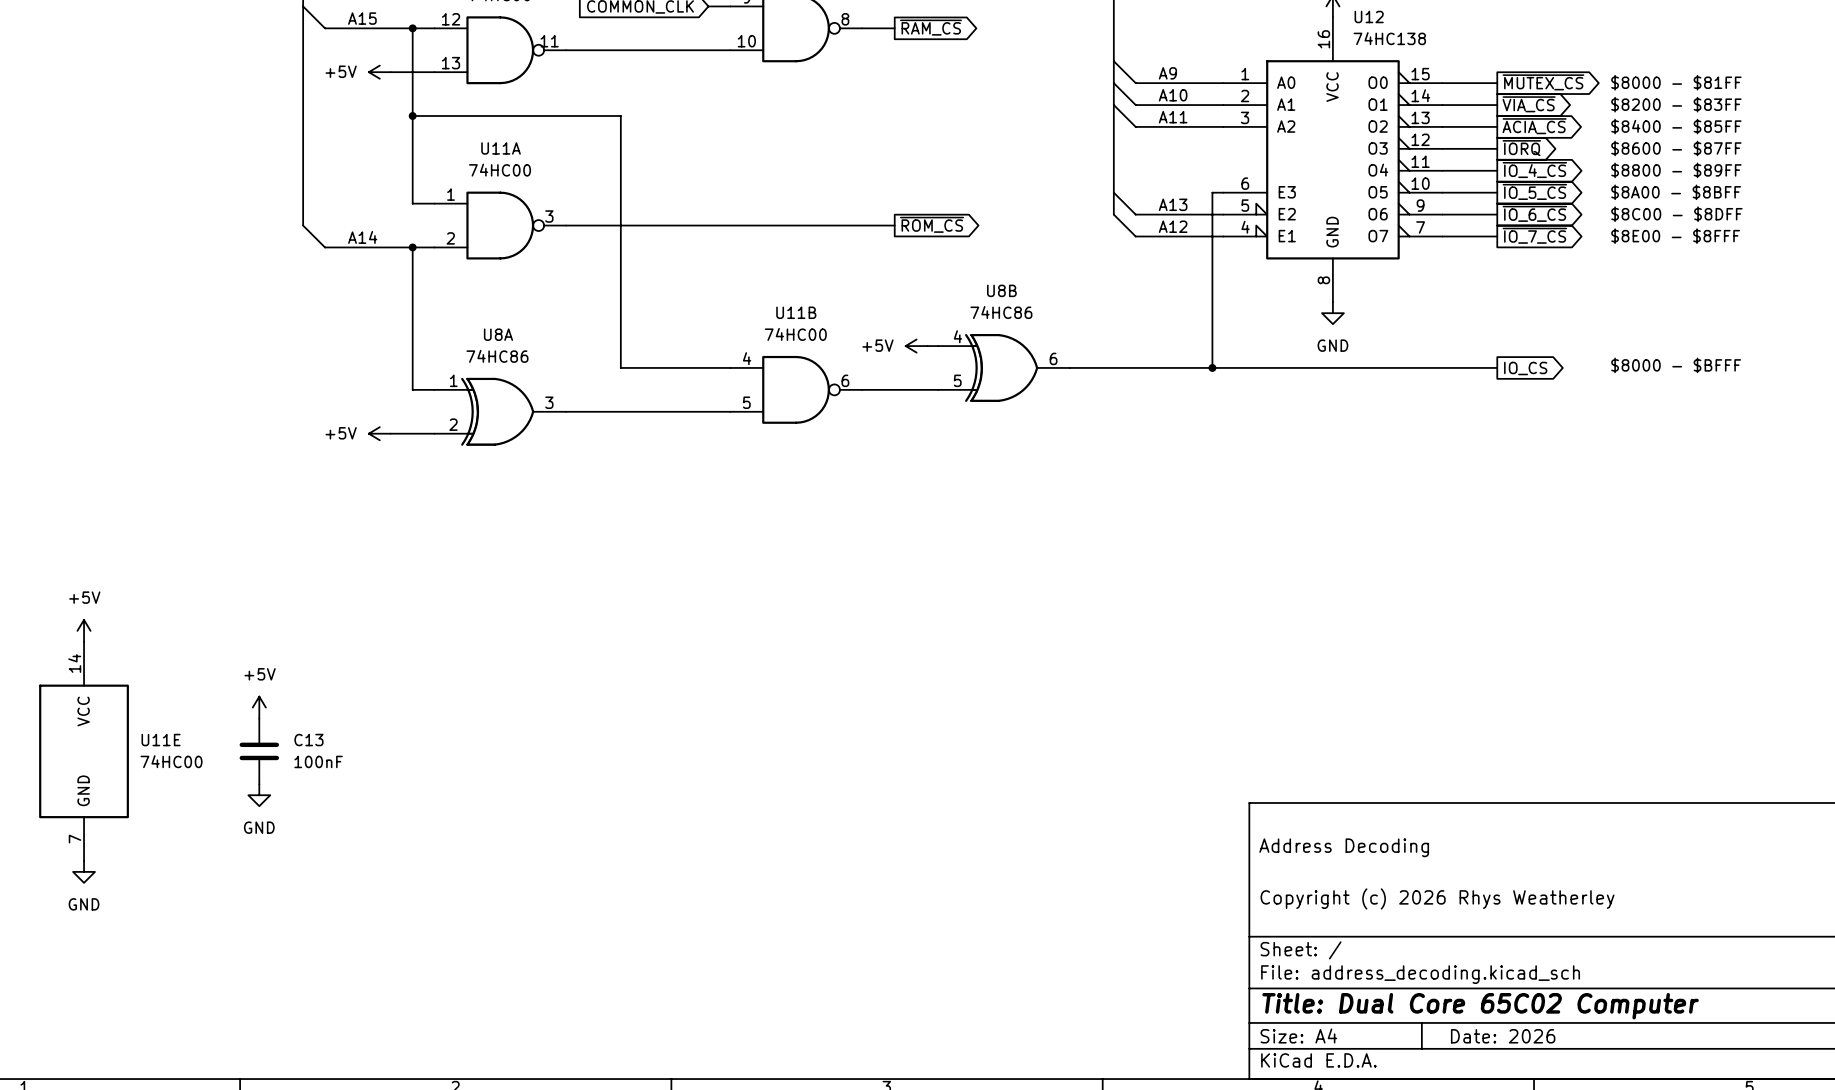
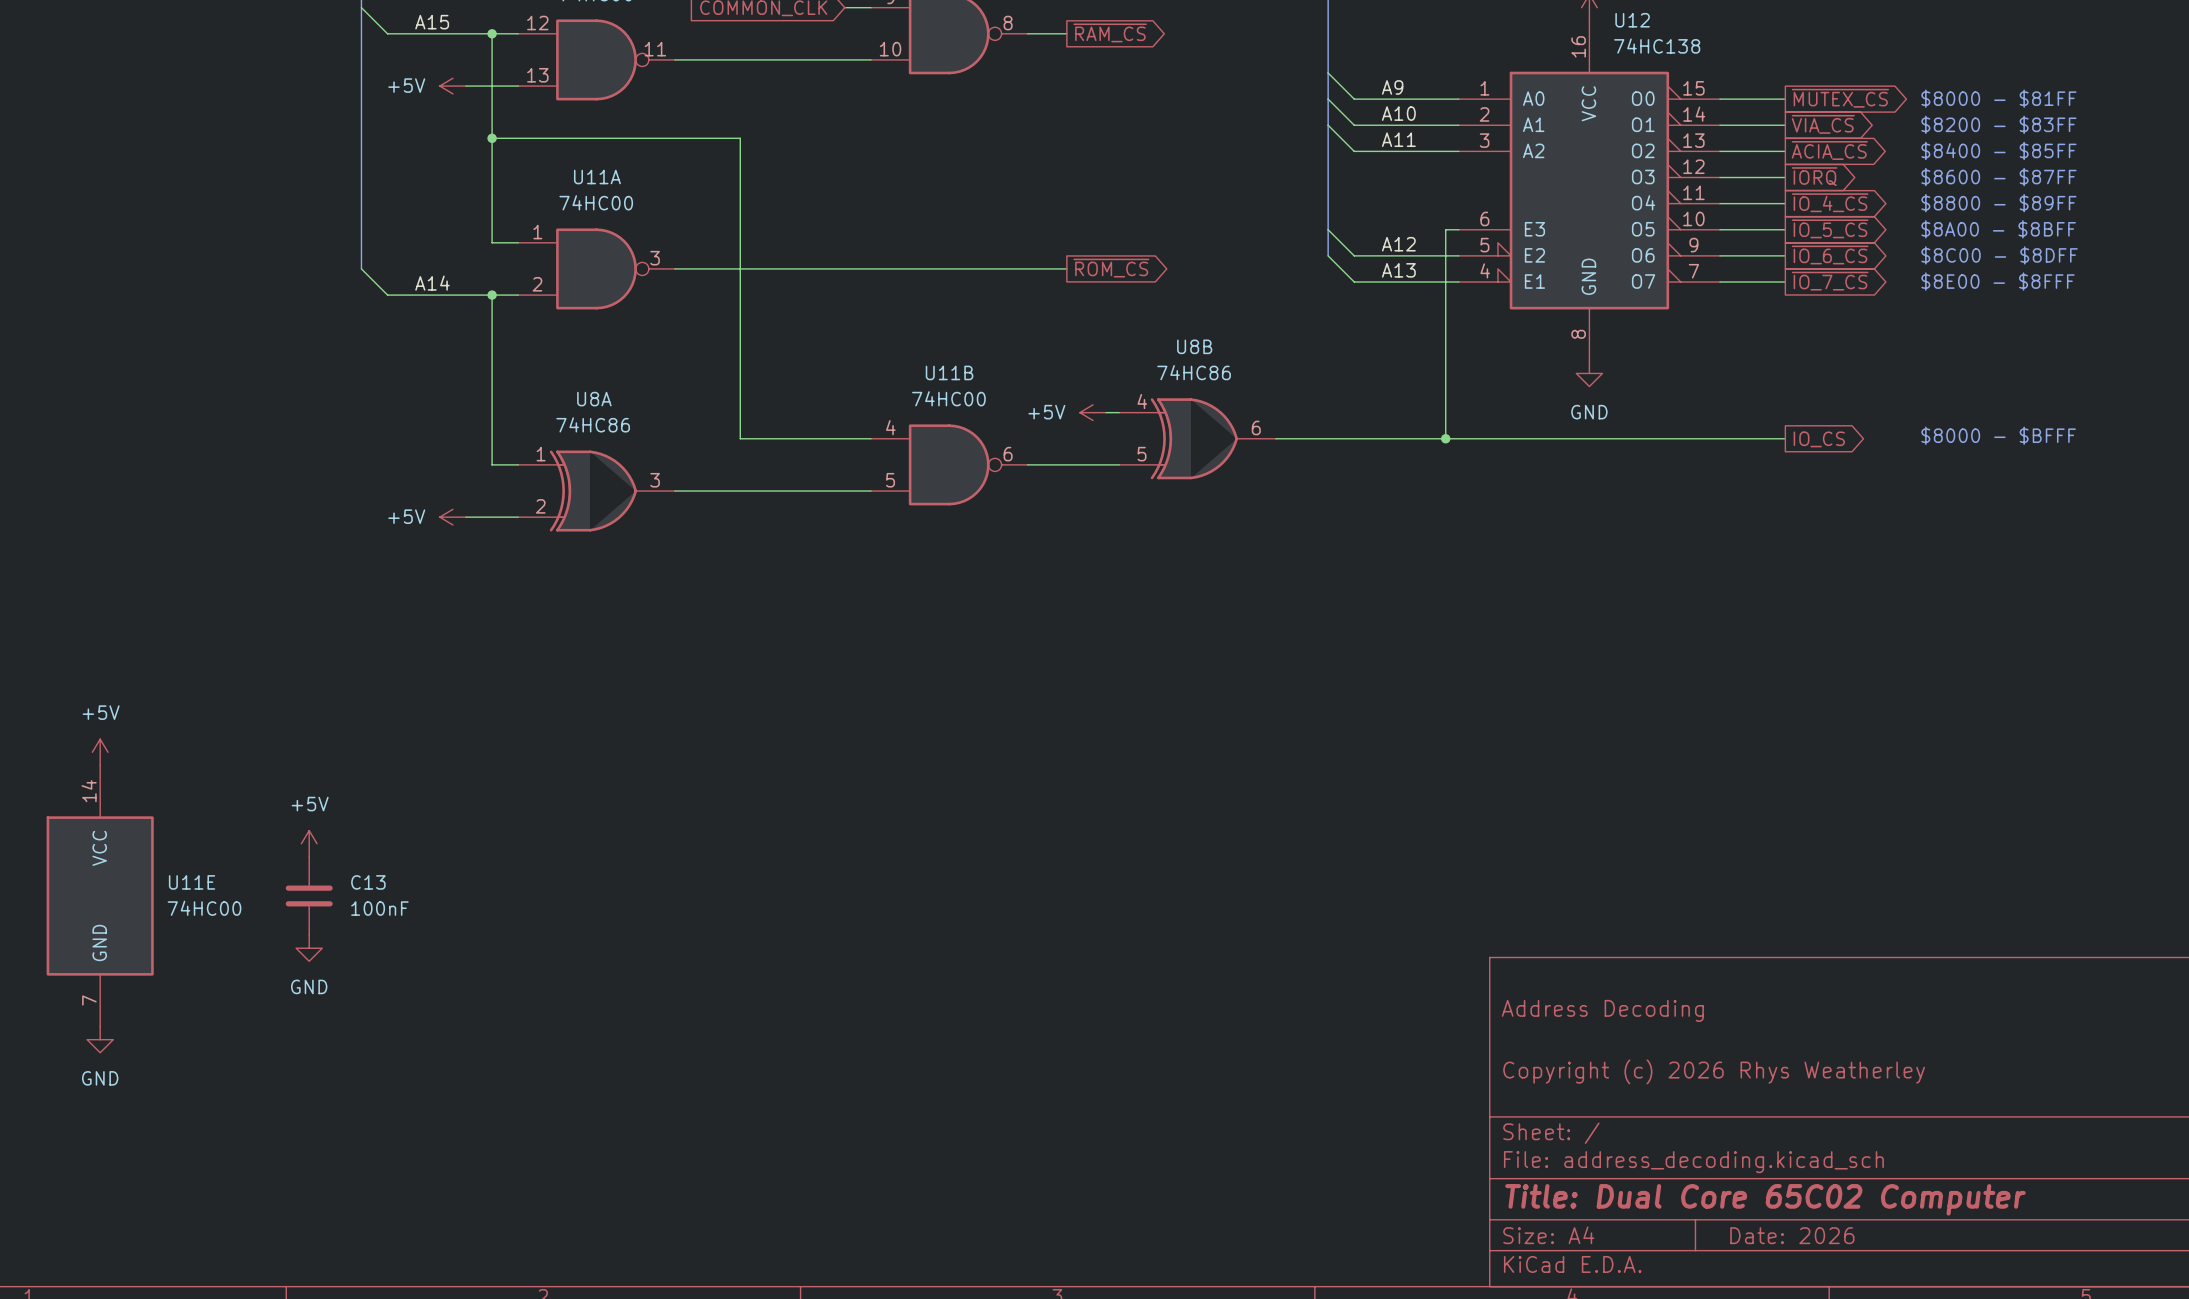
label: A13 (1173, 204) -> A12 (1398, 244)
label: A12 (1173, 226) -> A13 (1398, 270)

